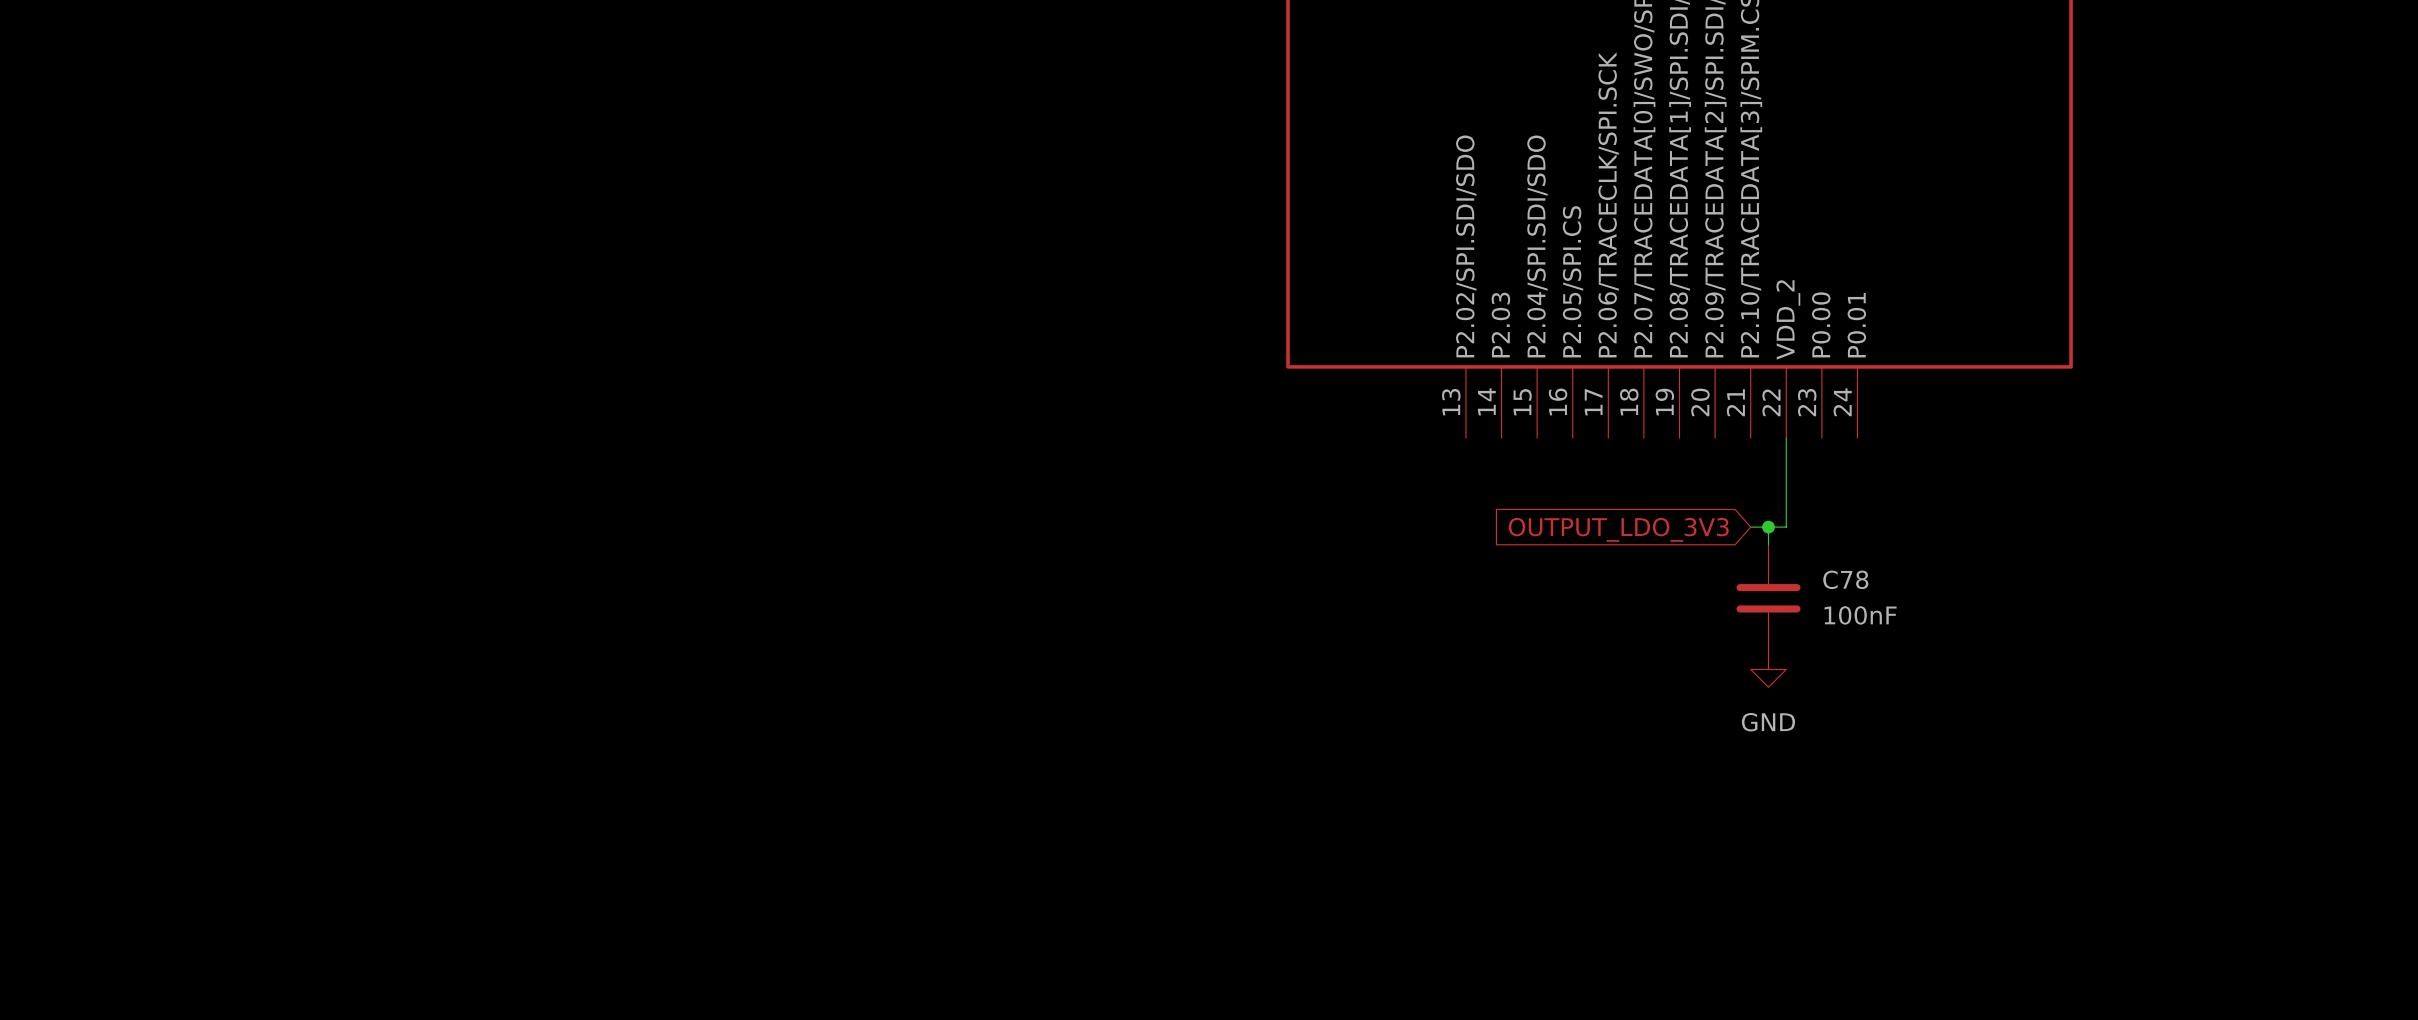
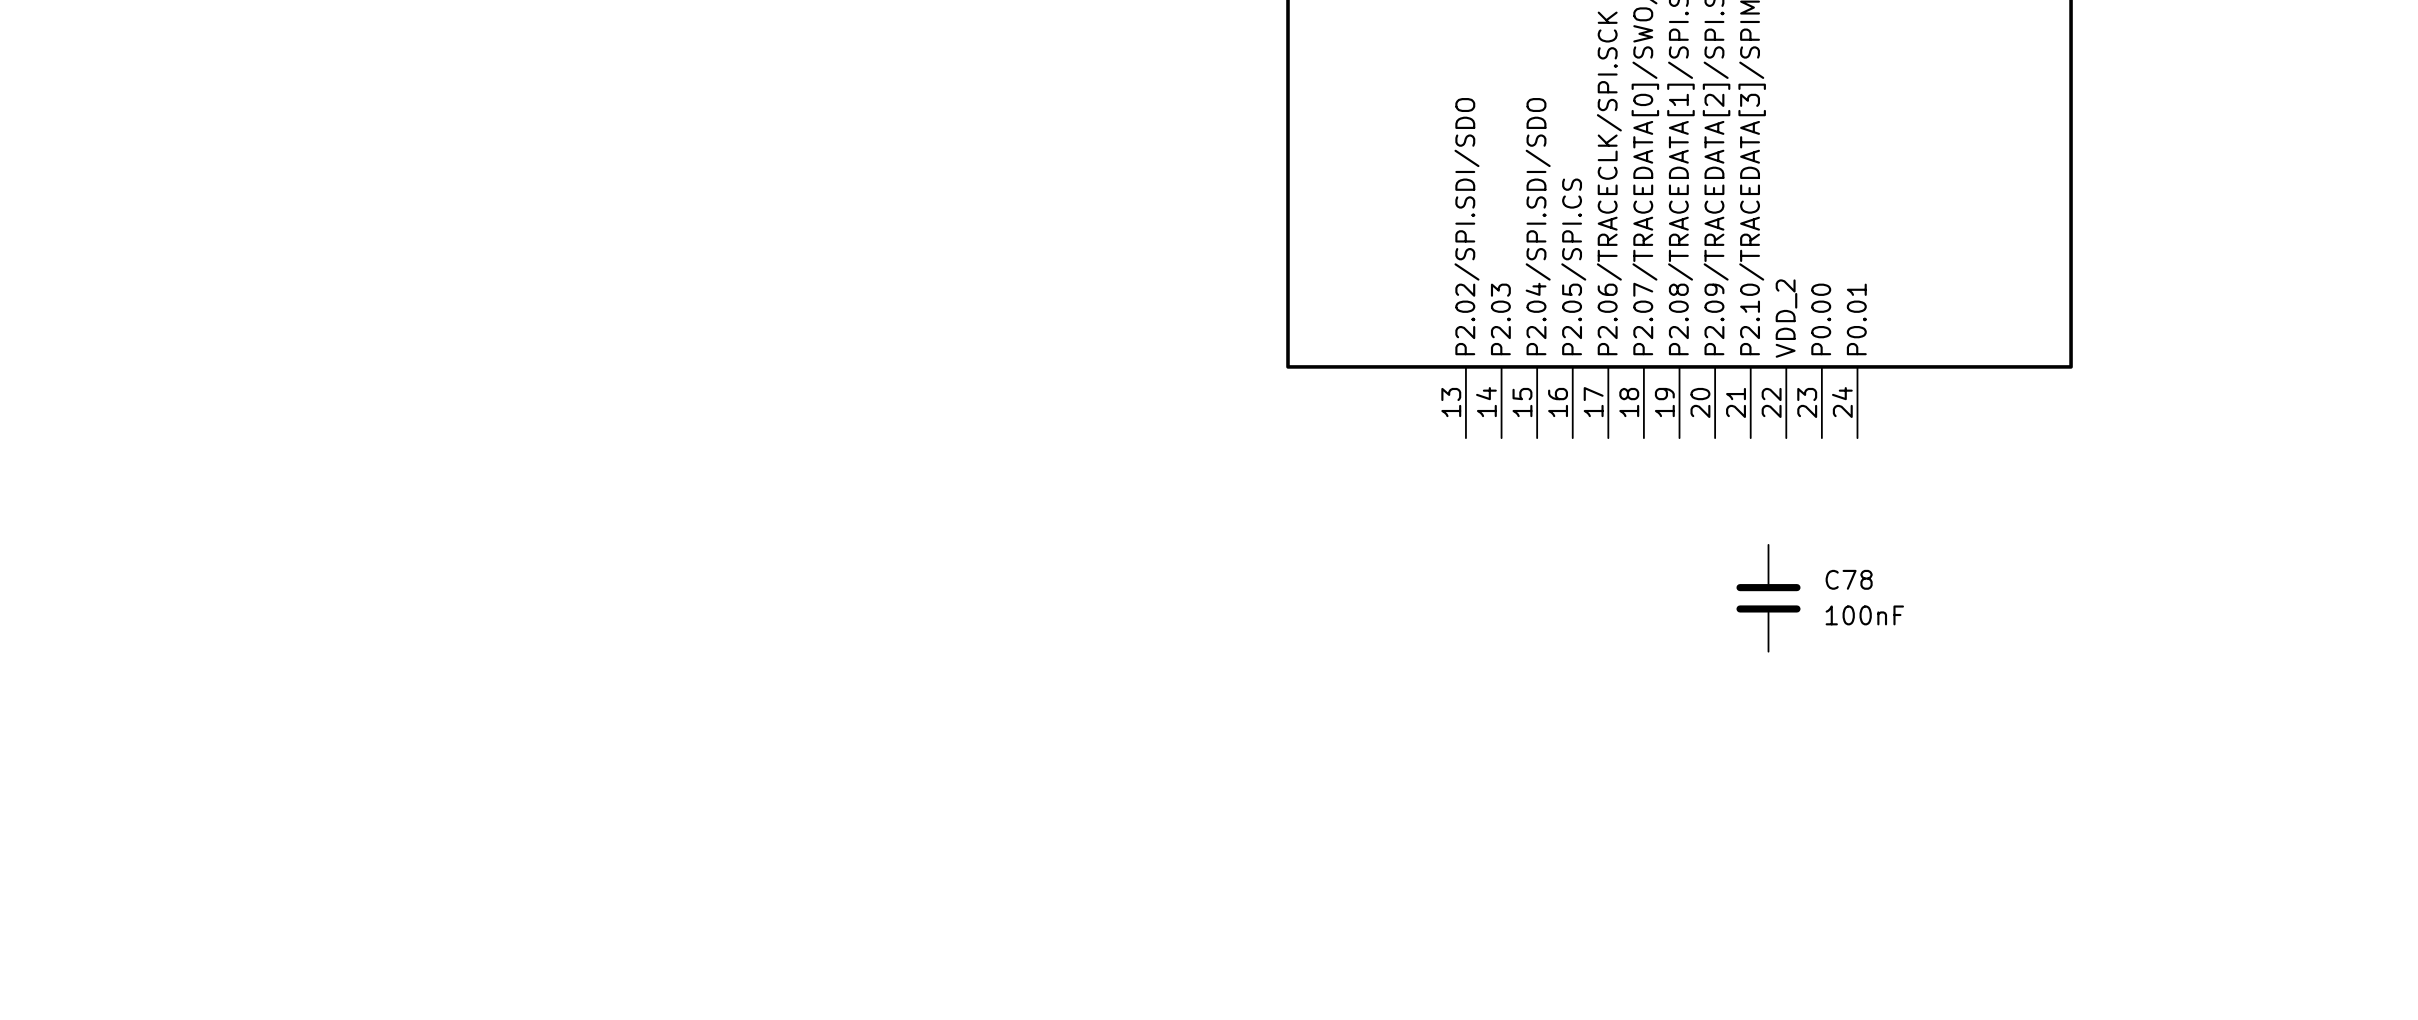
wire: (1786, 438) (1786, 527) (1750, 527) -> none
wire: (1768, 527) (1768, 544) -> none
junction: (1768, 527) -> none
global label: OUTPUT_LDO_3V3 (1618, 529) -> none
power symbol: GND (1768, 669) -> none

